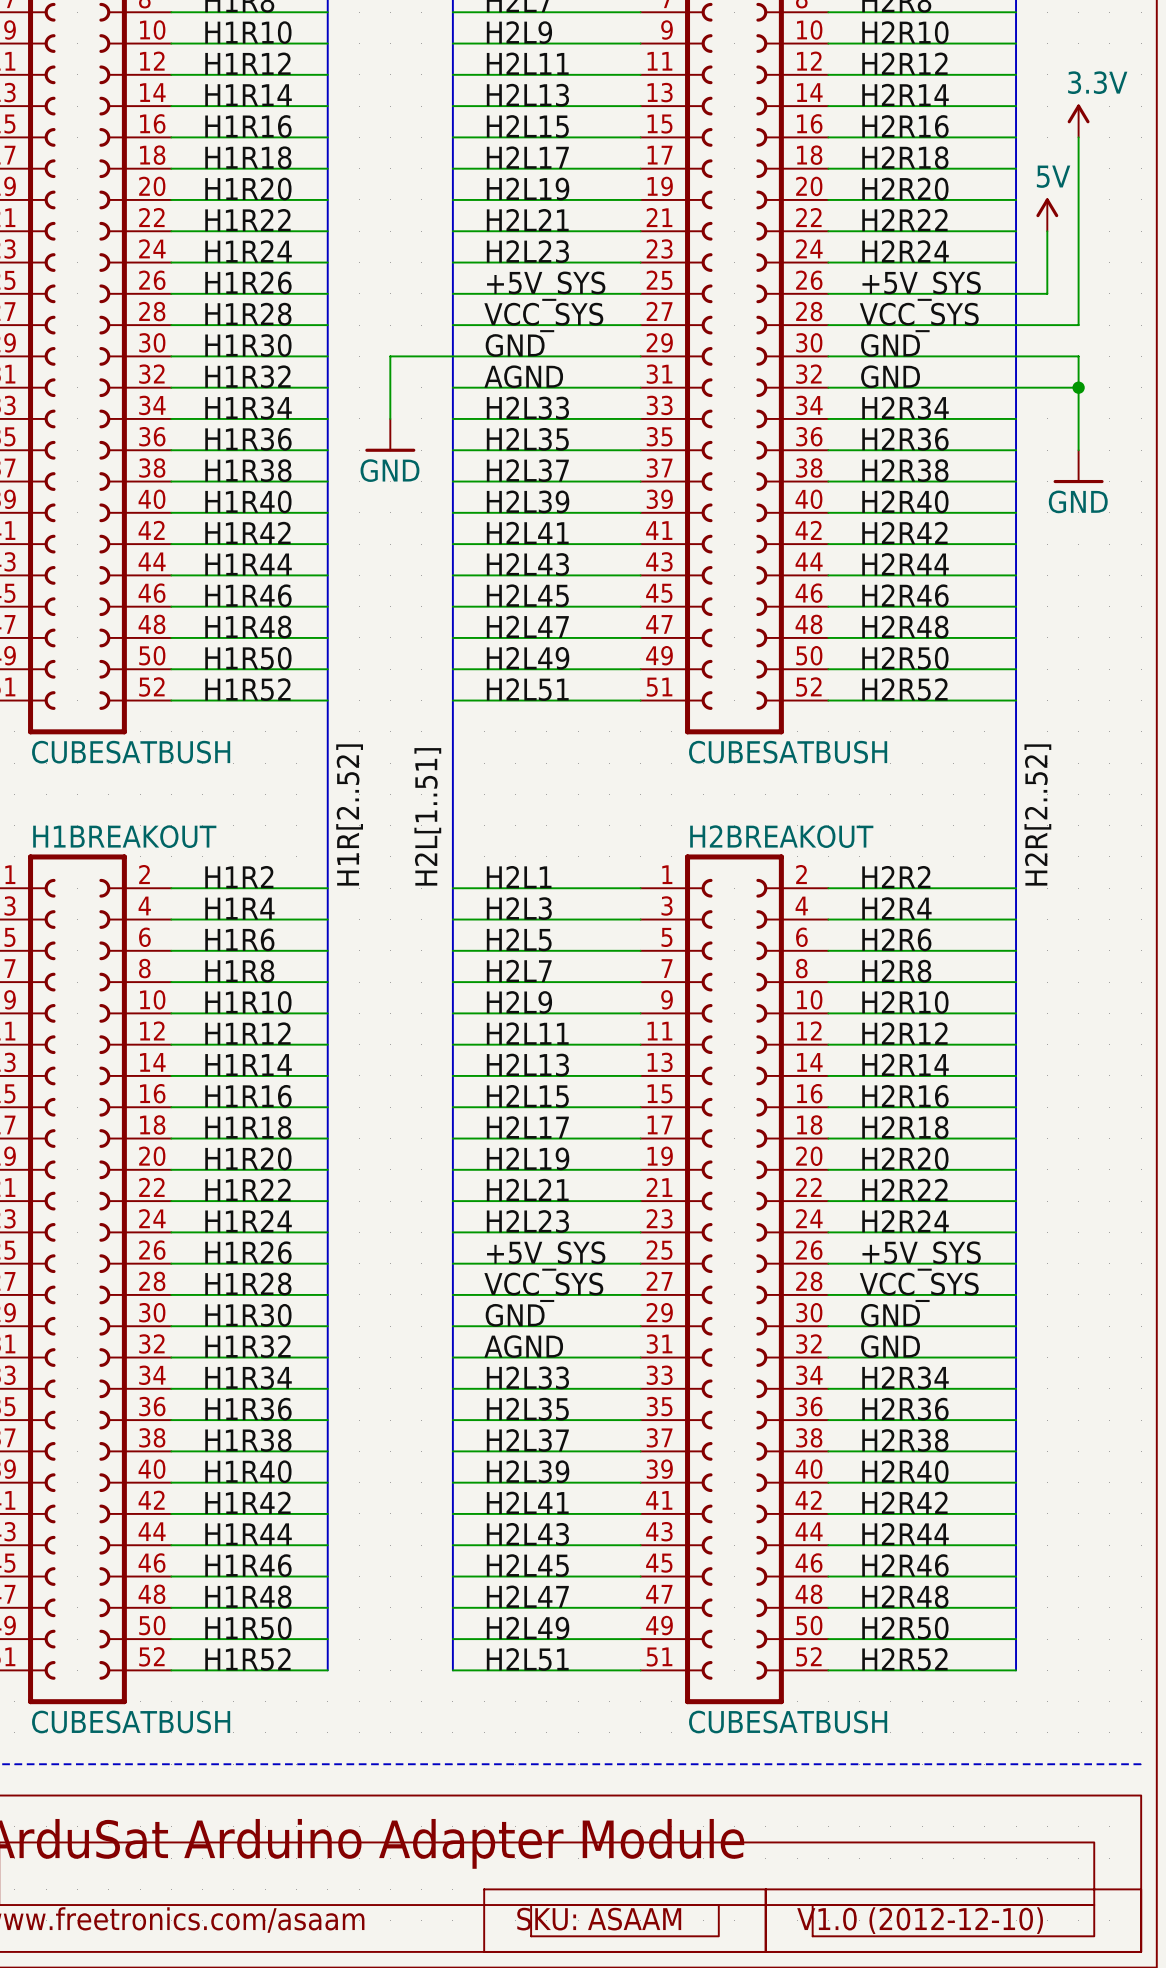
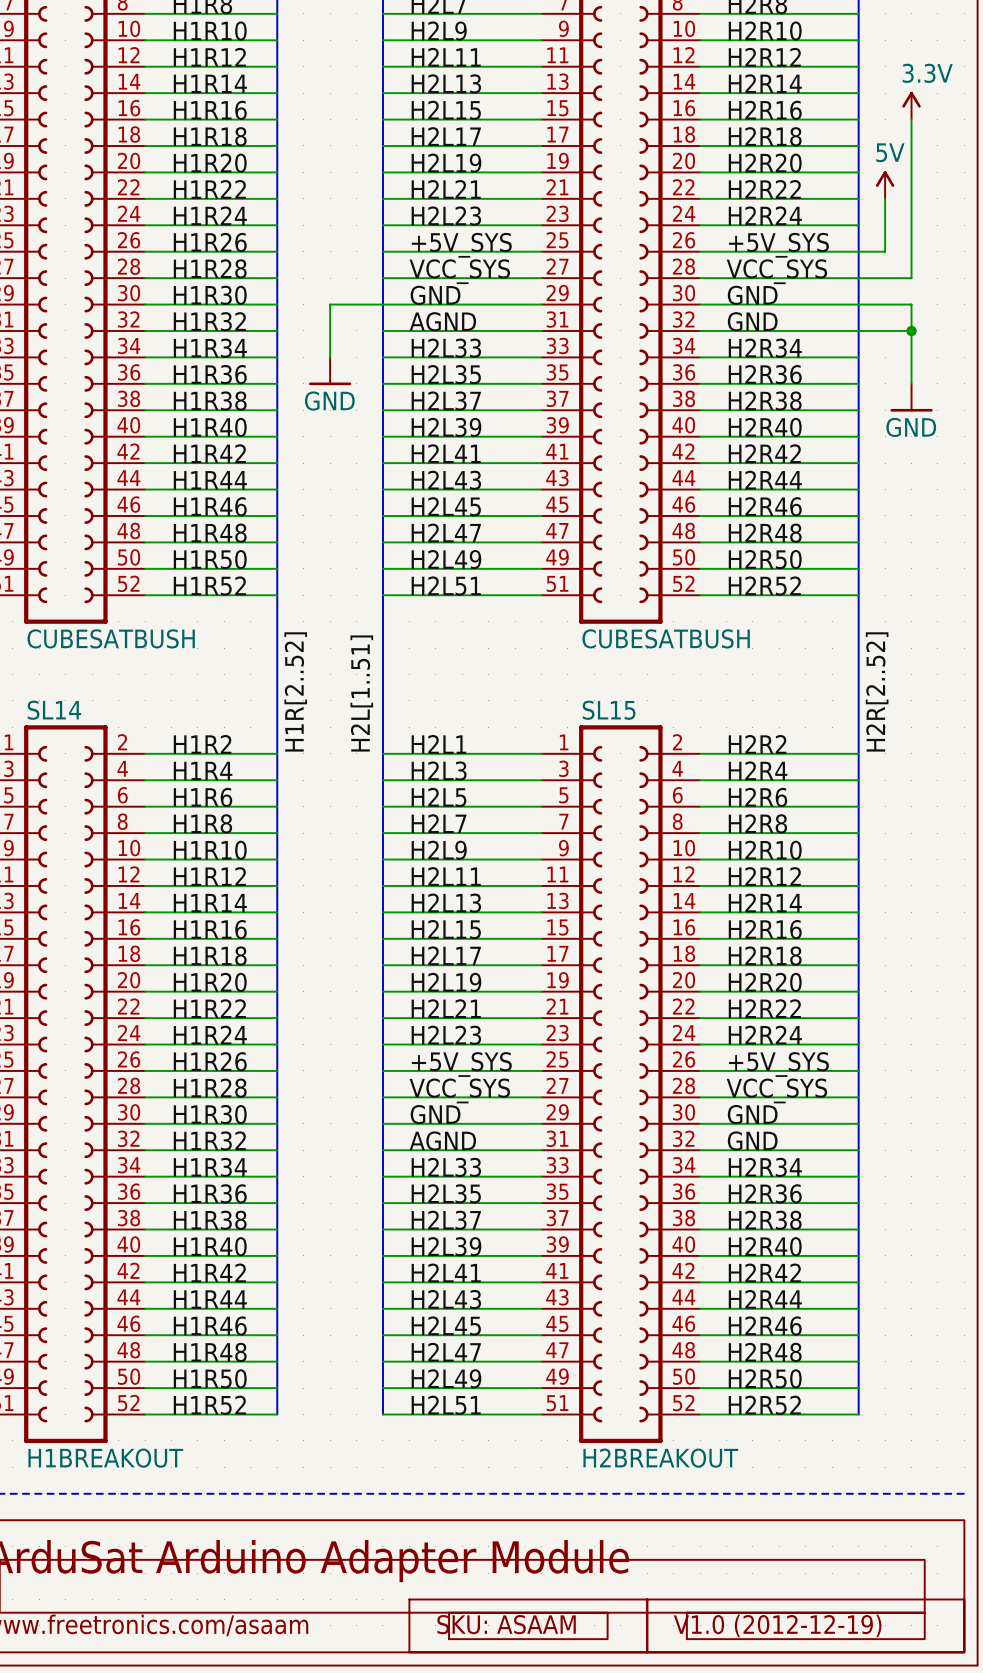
H1BREAKOUT name: H1BREAKOUT (124, 836) -> SL14 (54, 710)
H2BREAKOUT name: H2BREAKOUT (781, 836) -> SL15 (609, 710)
H1BREAKOUT value: CUBESATBUSH (131, 1722) -> H1BREAKOUT (105, 1458)
H2BREAKOUT value: CUBESATBUSH (788, 1722) -> H2BREAKOUT (660, 1458)
text: V1.0 (2012-12-10) (920, 1920) -> V1.0 (2012-12-19) (777, 1625)

